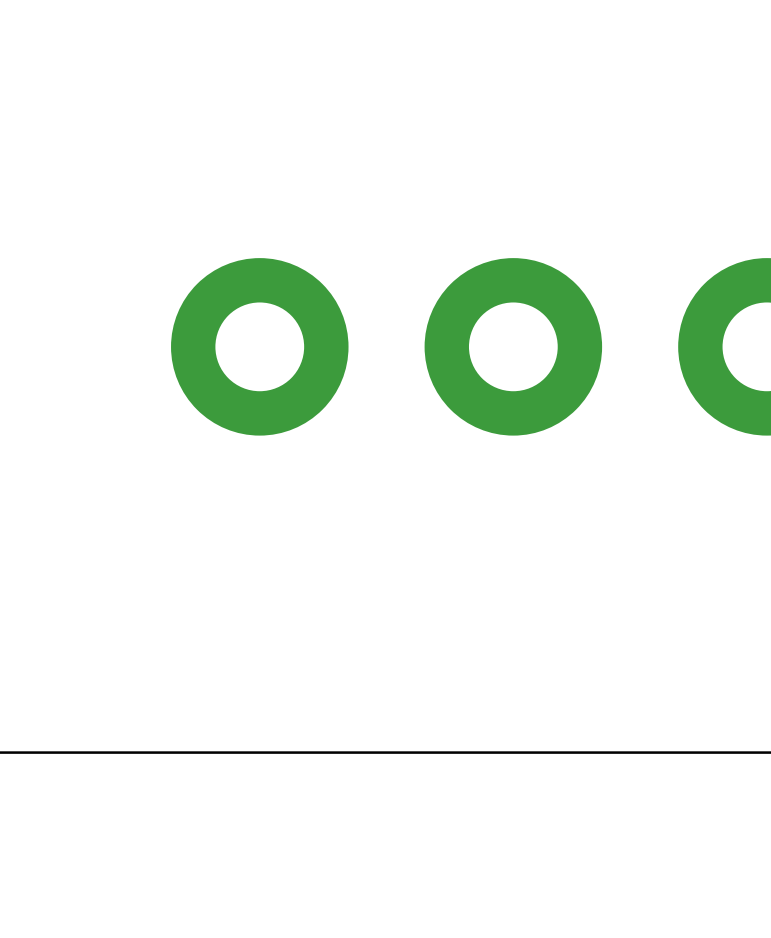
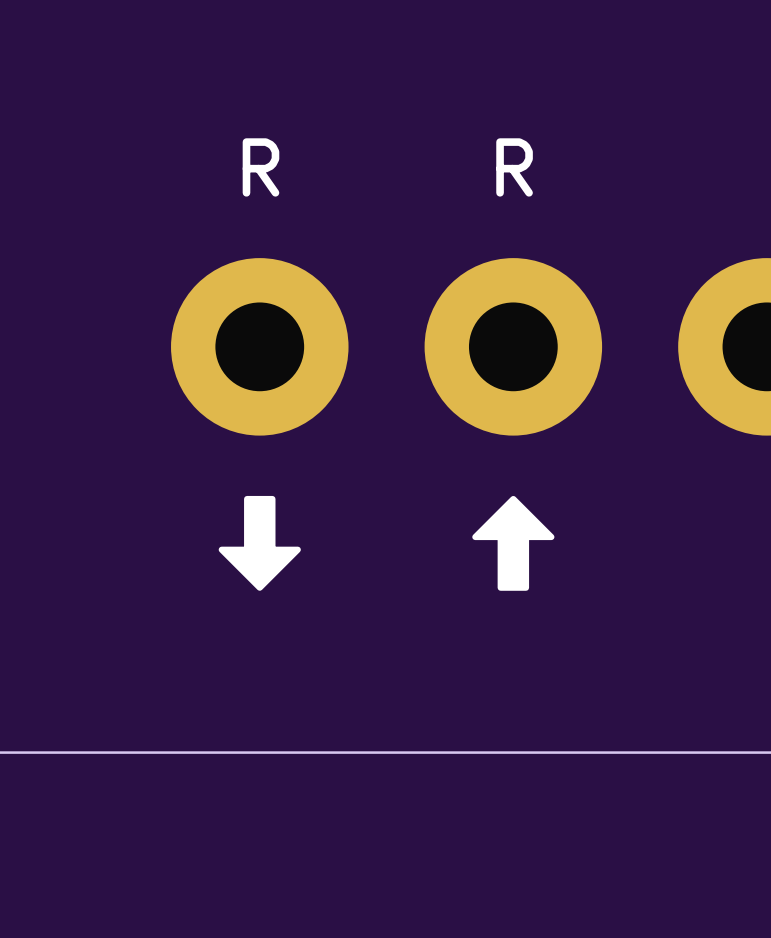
text: none -> R (260, 167)
text: none -> R (514, 167)
drawing: none -> [218, 495, 301, 591]
drawing: none -> [472, 495, 555, 591]

